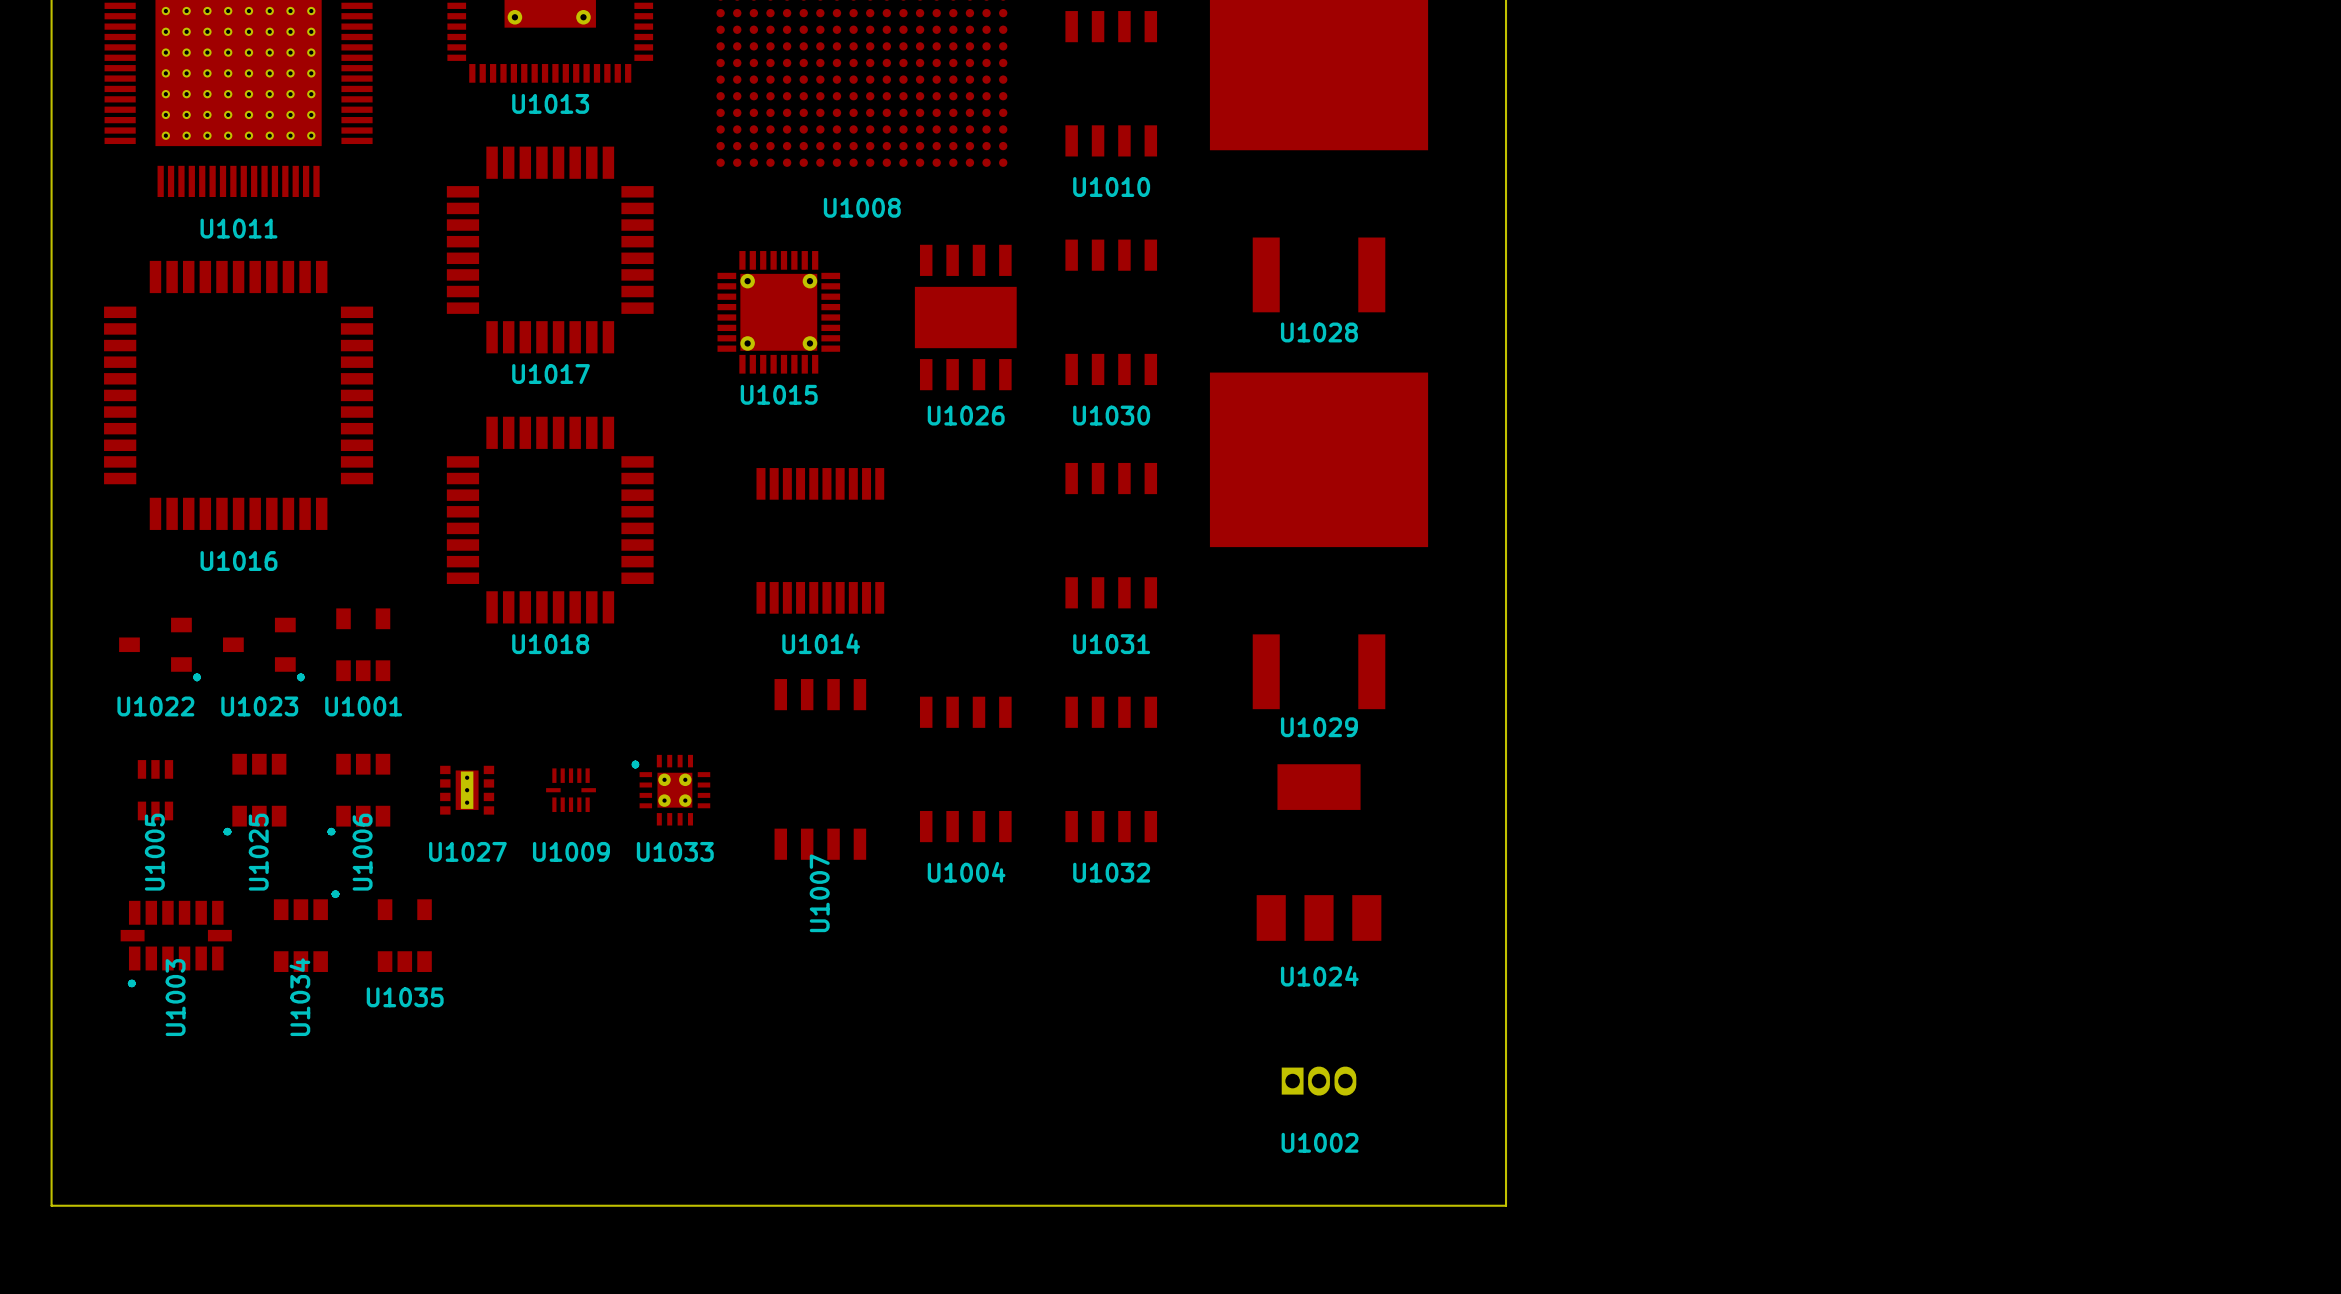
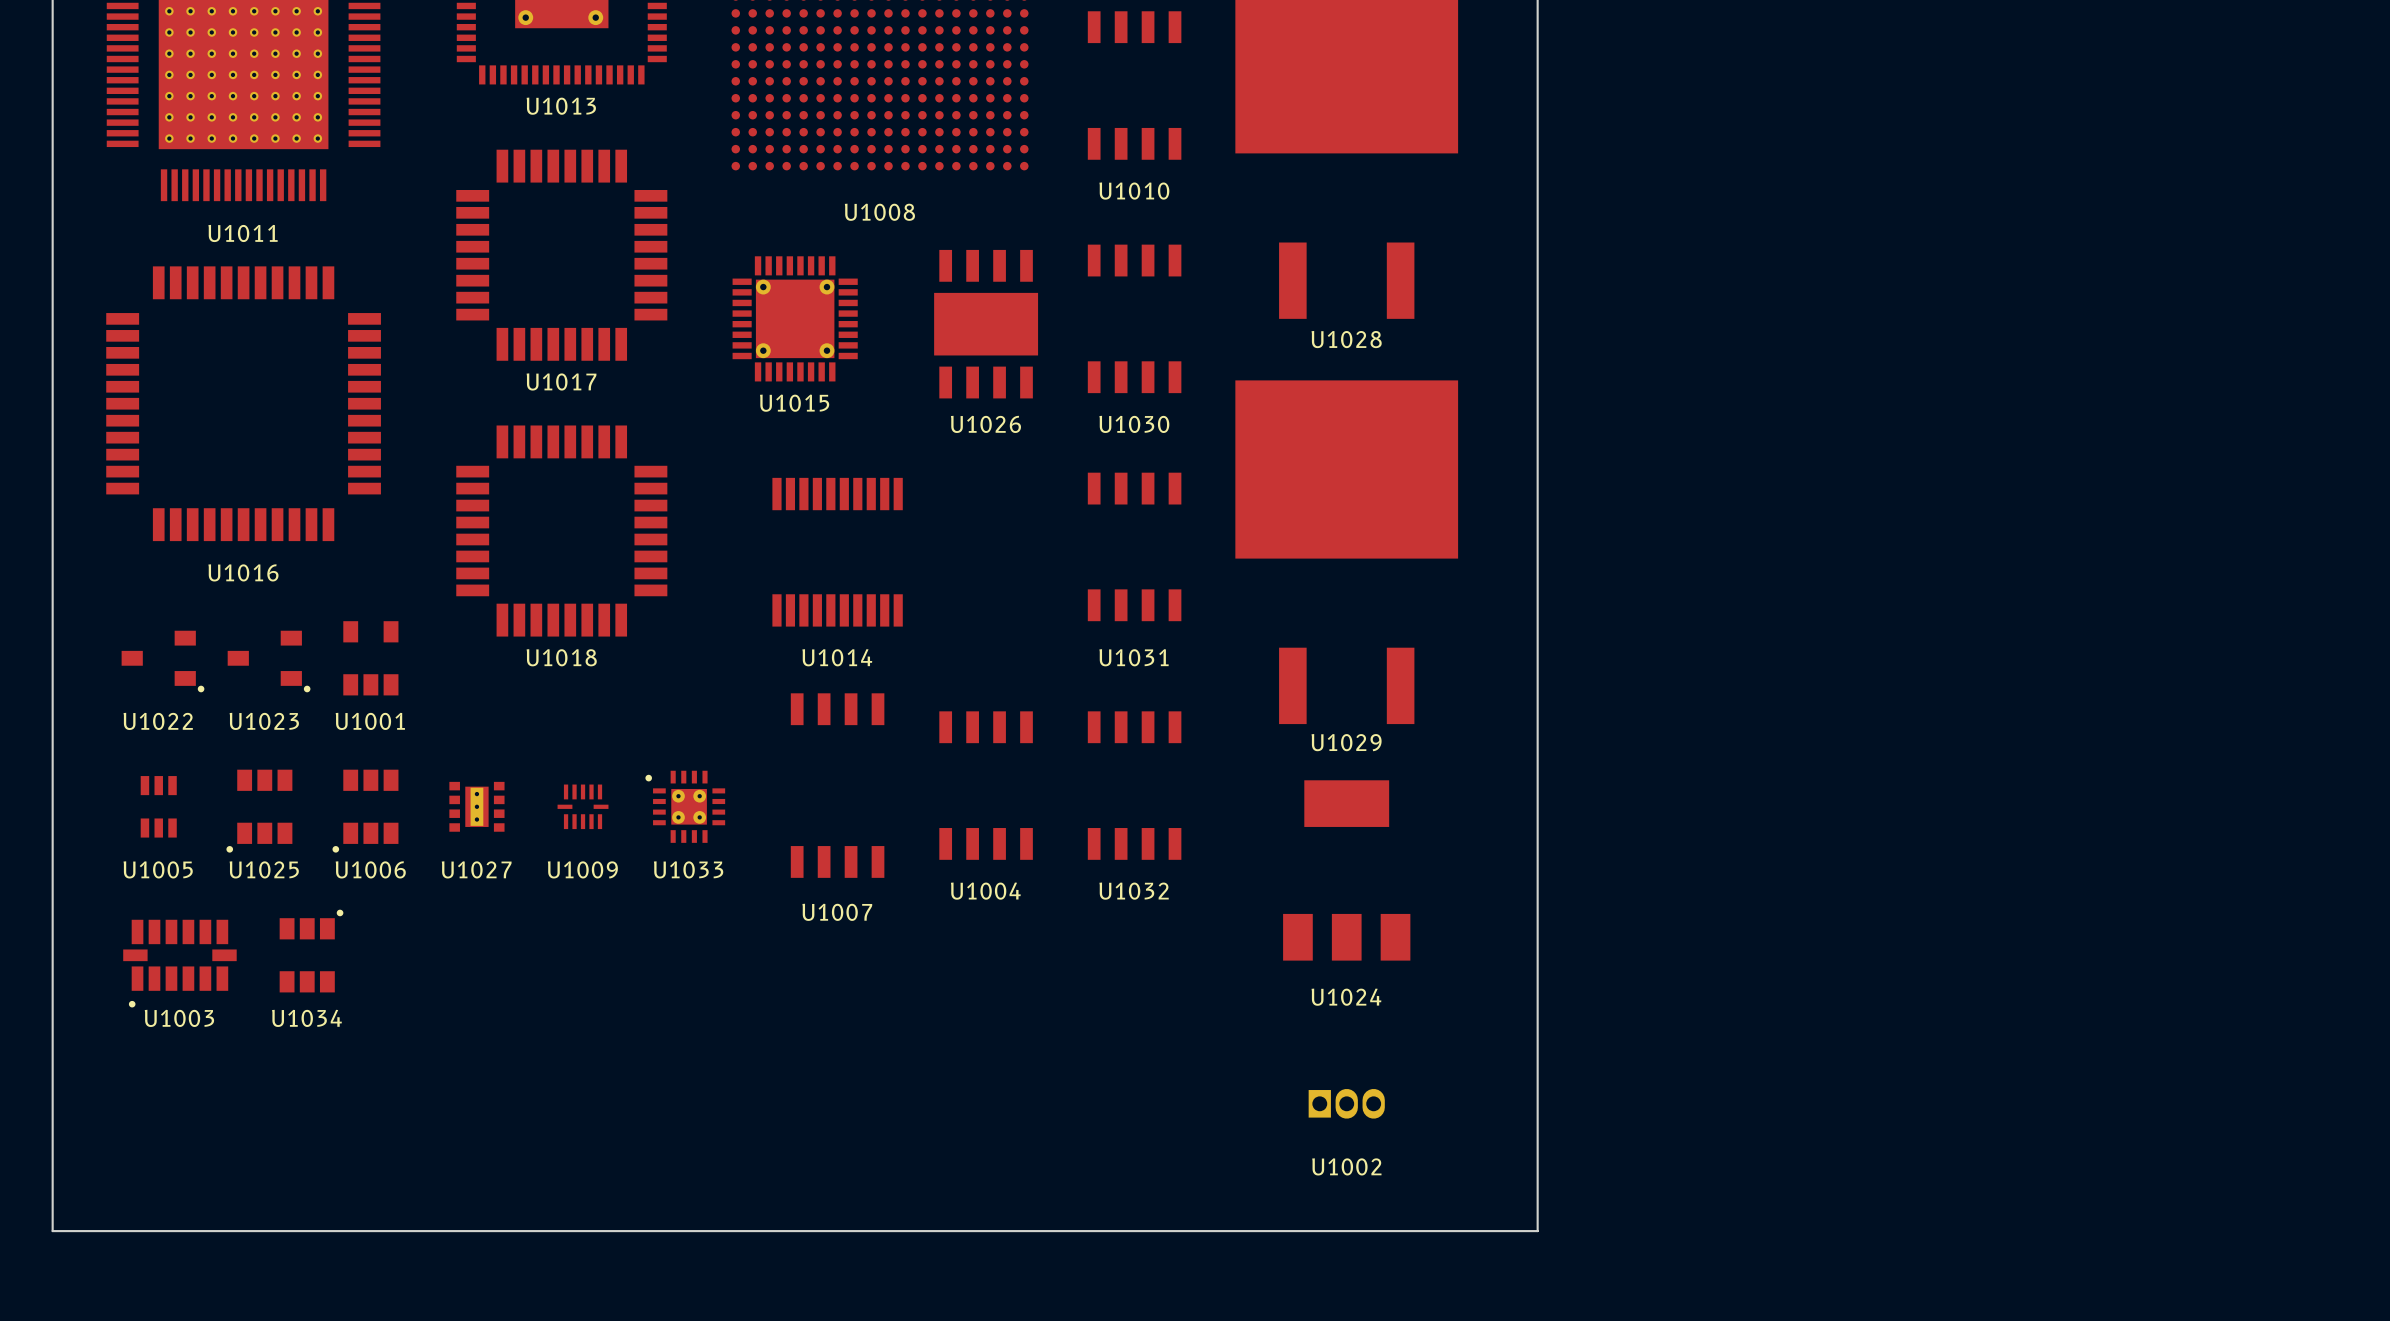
U1005 name rotation: 0° (154, 852) -> 90° clockwise (158, 869)
U1025 name rotation: 0° (258, 852) -> 90° clockwise (264, 869)
U1006 name rotation: 0° (362, 852) -> 90° clockwise (370, 869)
U1007 name rotation: 0° (819, 893) -> 90° clockwise (837, 912)
U1035: (404, 935) -> none
U1003 name rotation: 0° (175, 997) -> 90° clockwise (179, 1018)
U1034 name rotation: 0° (299, 997) -> 90° clockwise (306, 1018)

